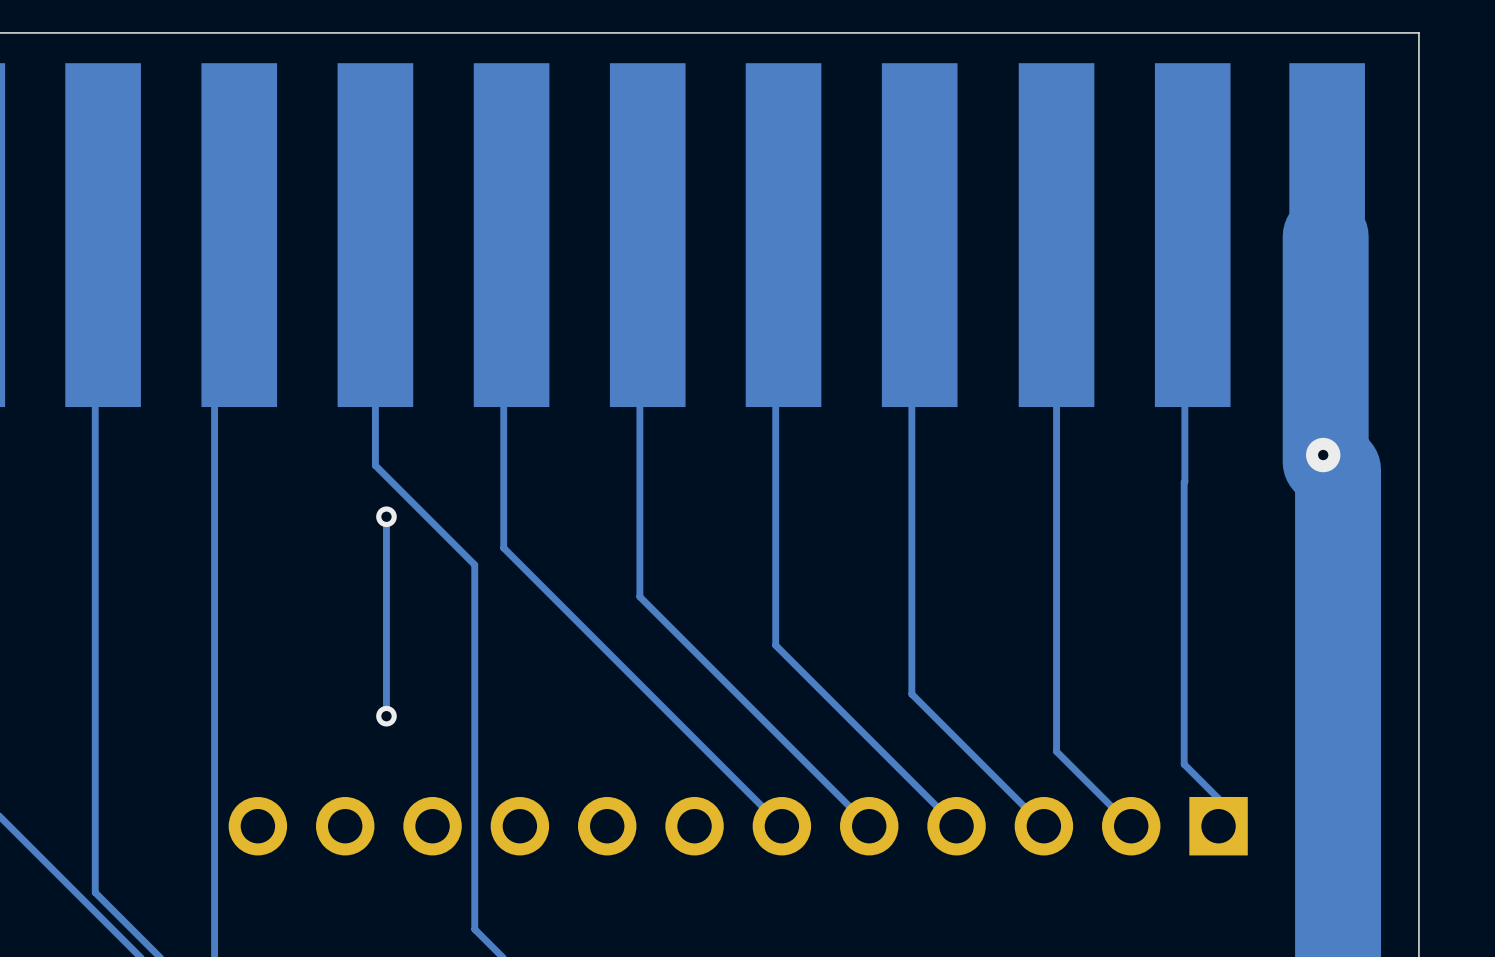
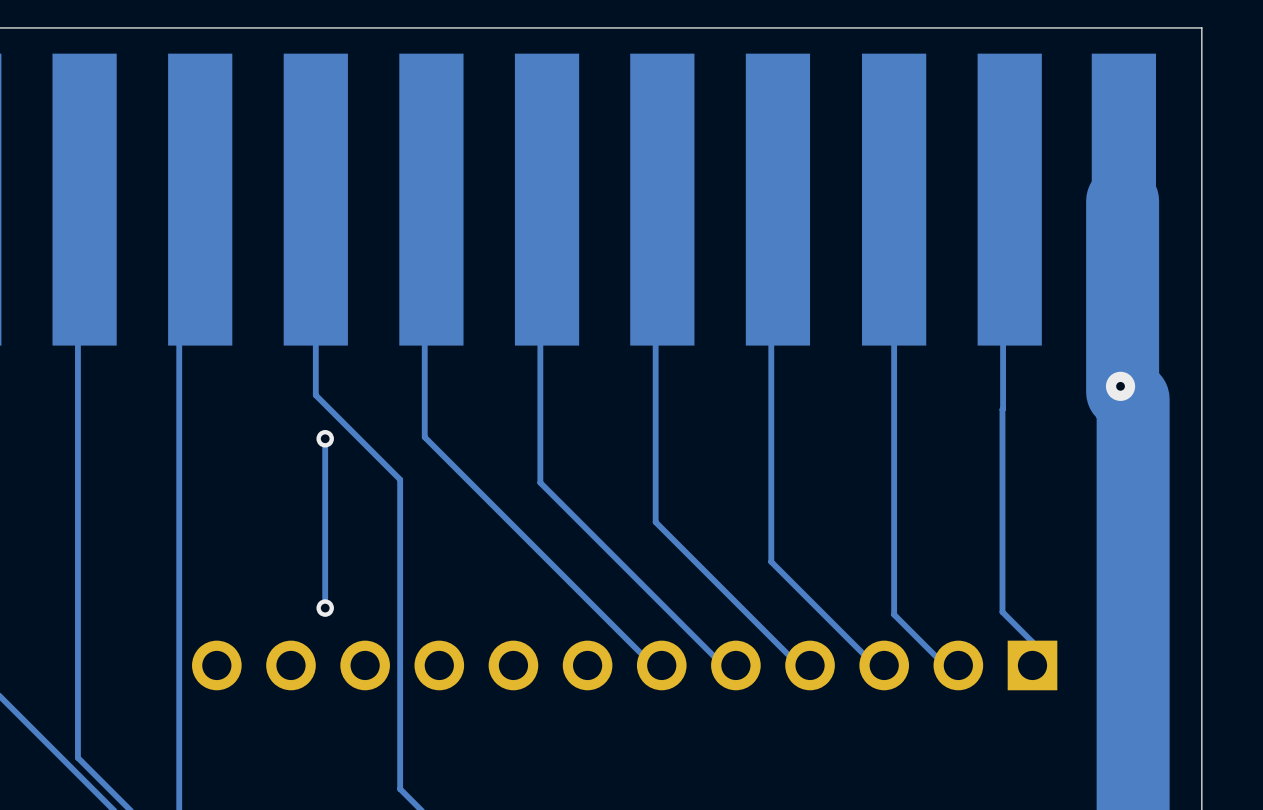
track: (503, 514) (503, 548) (781, 826) -> (424, 437) (652, 665) (661, 665)
track: (639, 568) (639, 596) (869, 826) -> (540, 482) (723, 665) (735, 665)
track: (775, 615) (775, 645) (956, 826) -> (655, 522) (798, 665) (810, 665)
track: (911, 661) (911, 694) (1043, 826) -> (771, 561) (874, 665) (884, 665)
track: (1184, 720) (1184, 764) (1218, 798) (1218, 826) -> (1002, 612) (1032, 642) (1032, 665)
track: (1056, 723) (1056, 751) (1131, 826) -> (894, 614) (944, 665) (958, 665)
part position: (738, 826) -> (624, 665)

